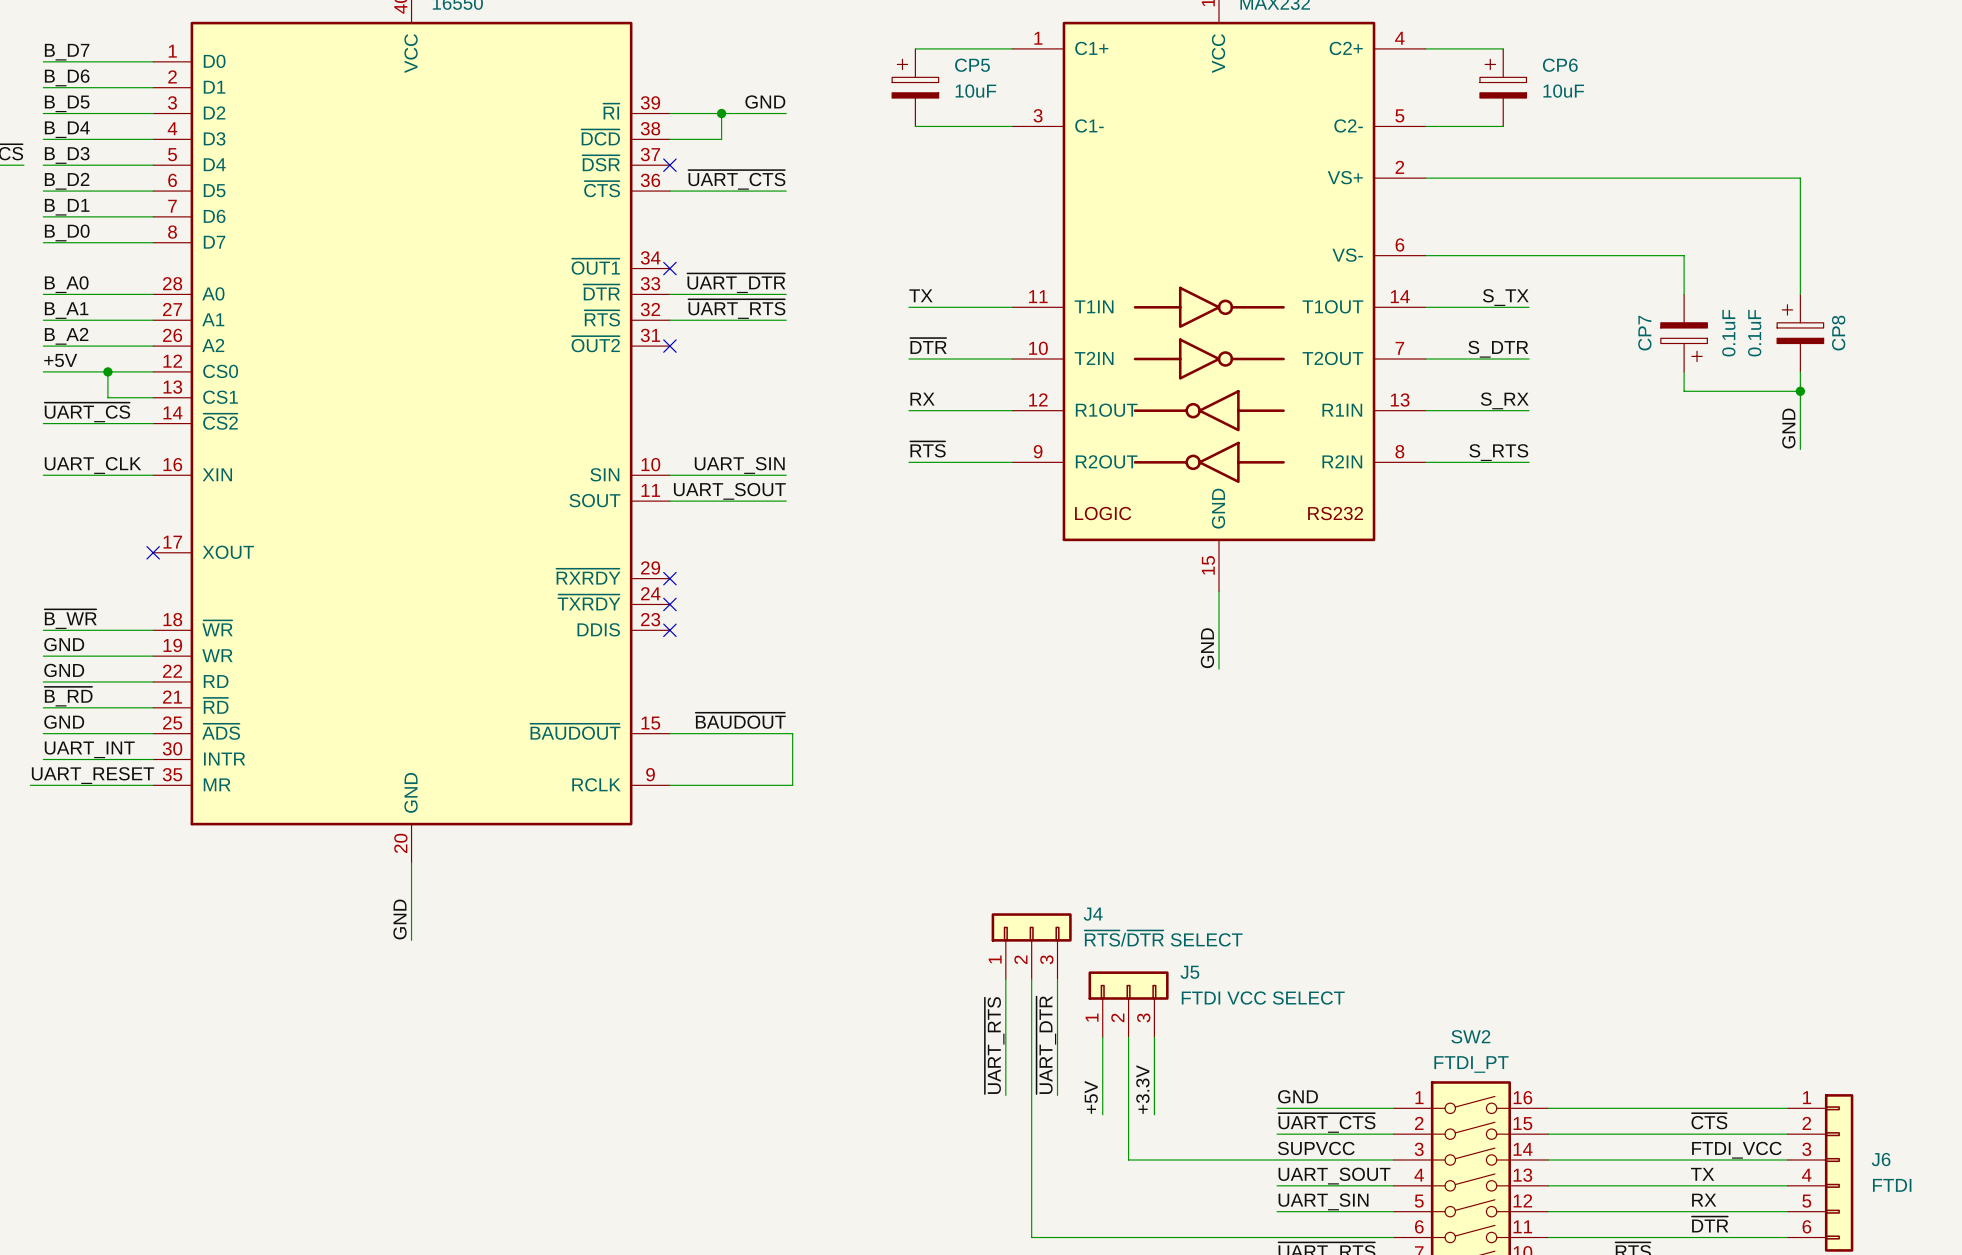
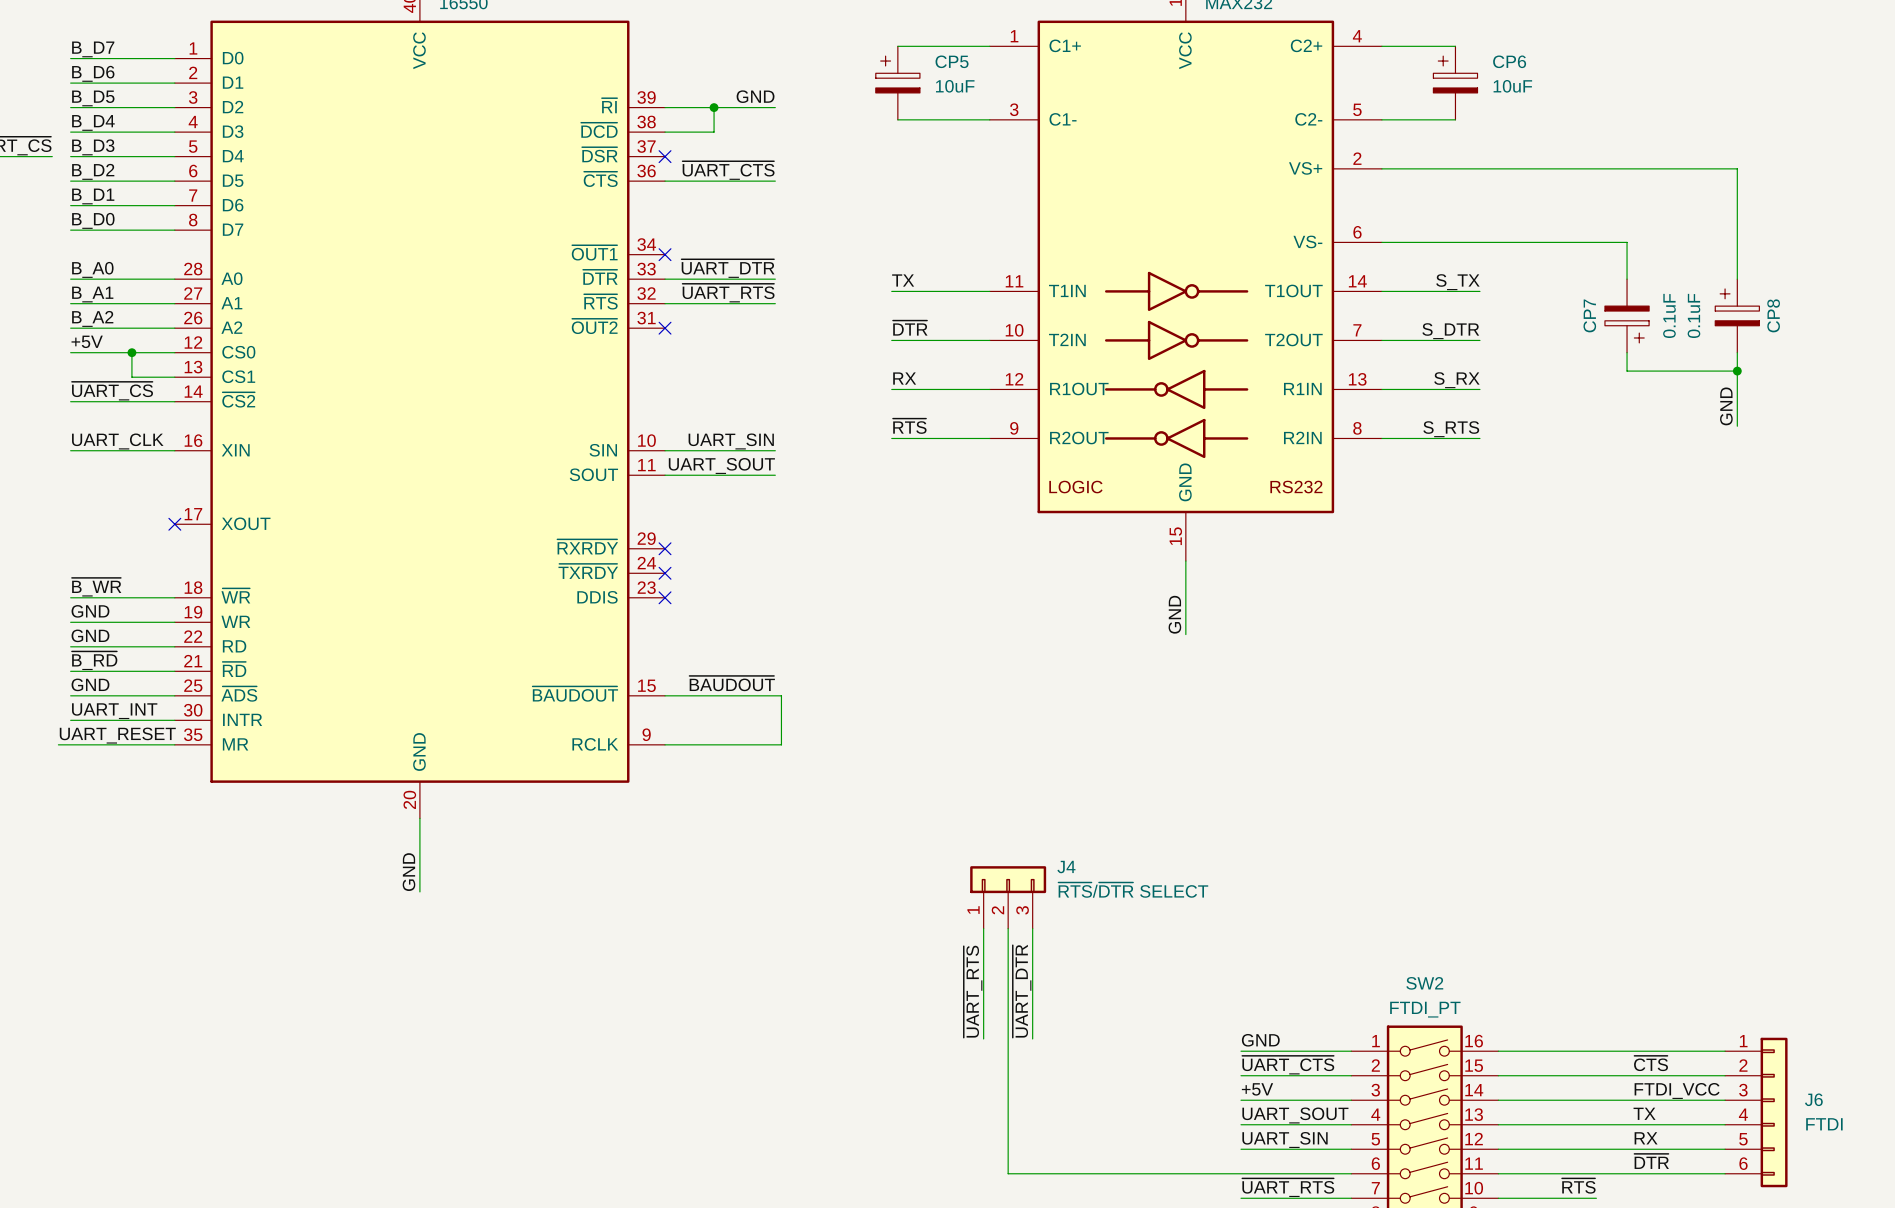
J5: FTDI VCC SELECT (1128, 1004) -> none
wire: (1102, 1037) (1102, 1114) -> none
wire: (1128, 1037) (1128, 1160) (1277, 1160) -> none
wire: (1154, 1037) (1154, 1114) -> none
label: +3.3V (1142, 1089) -> none
label: +5V (1091, 1097) -> none
label: SUPVCC (1316, 1148) -> +5V (1257, 1089)

